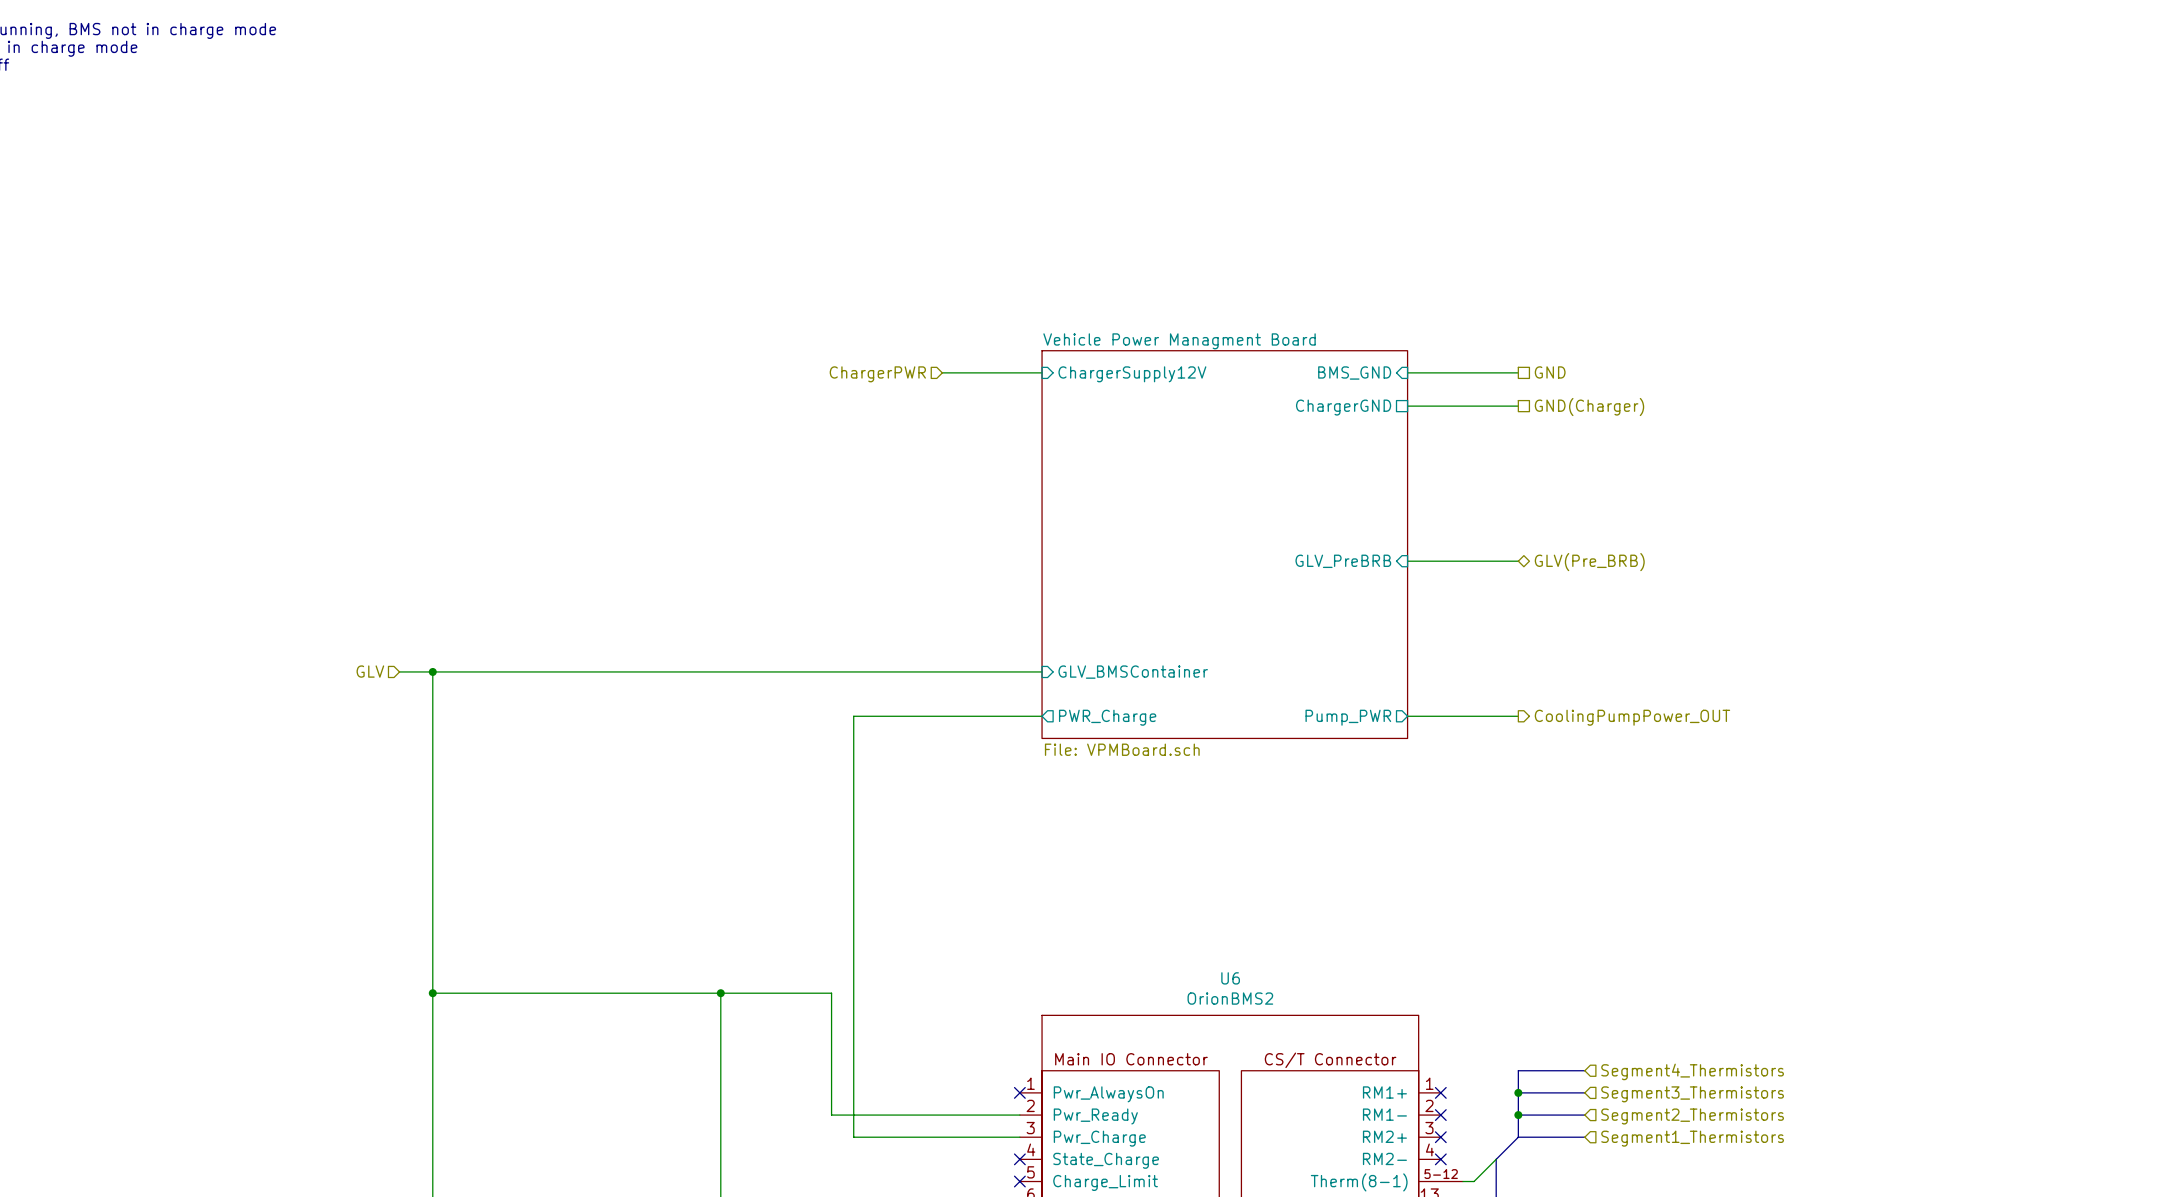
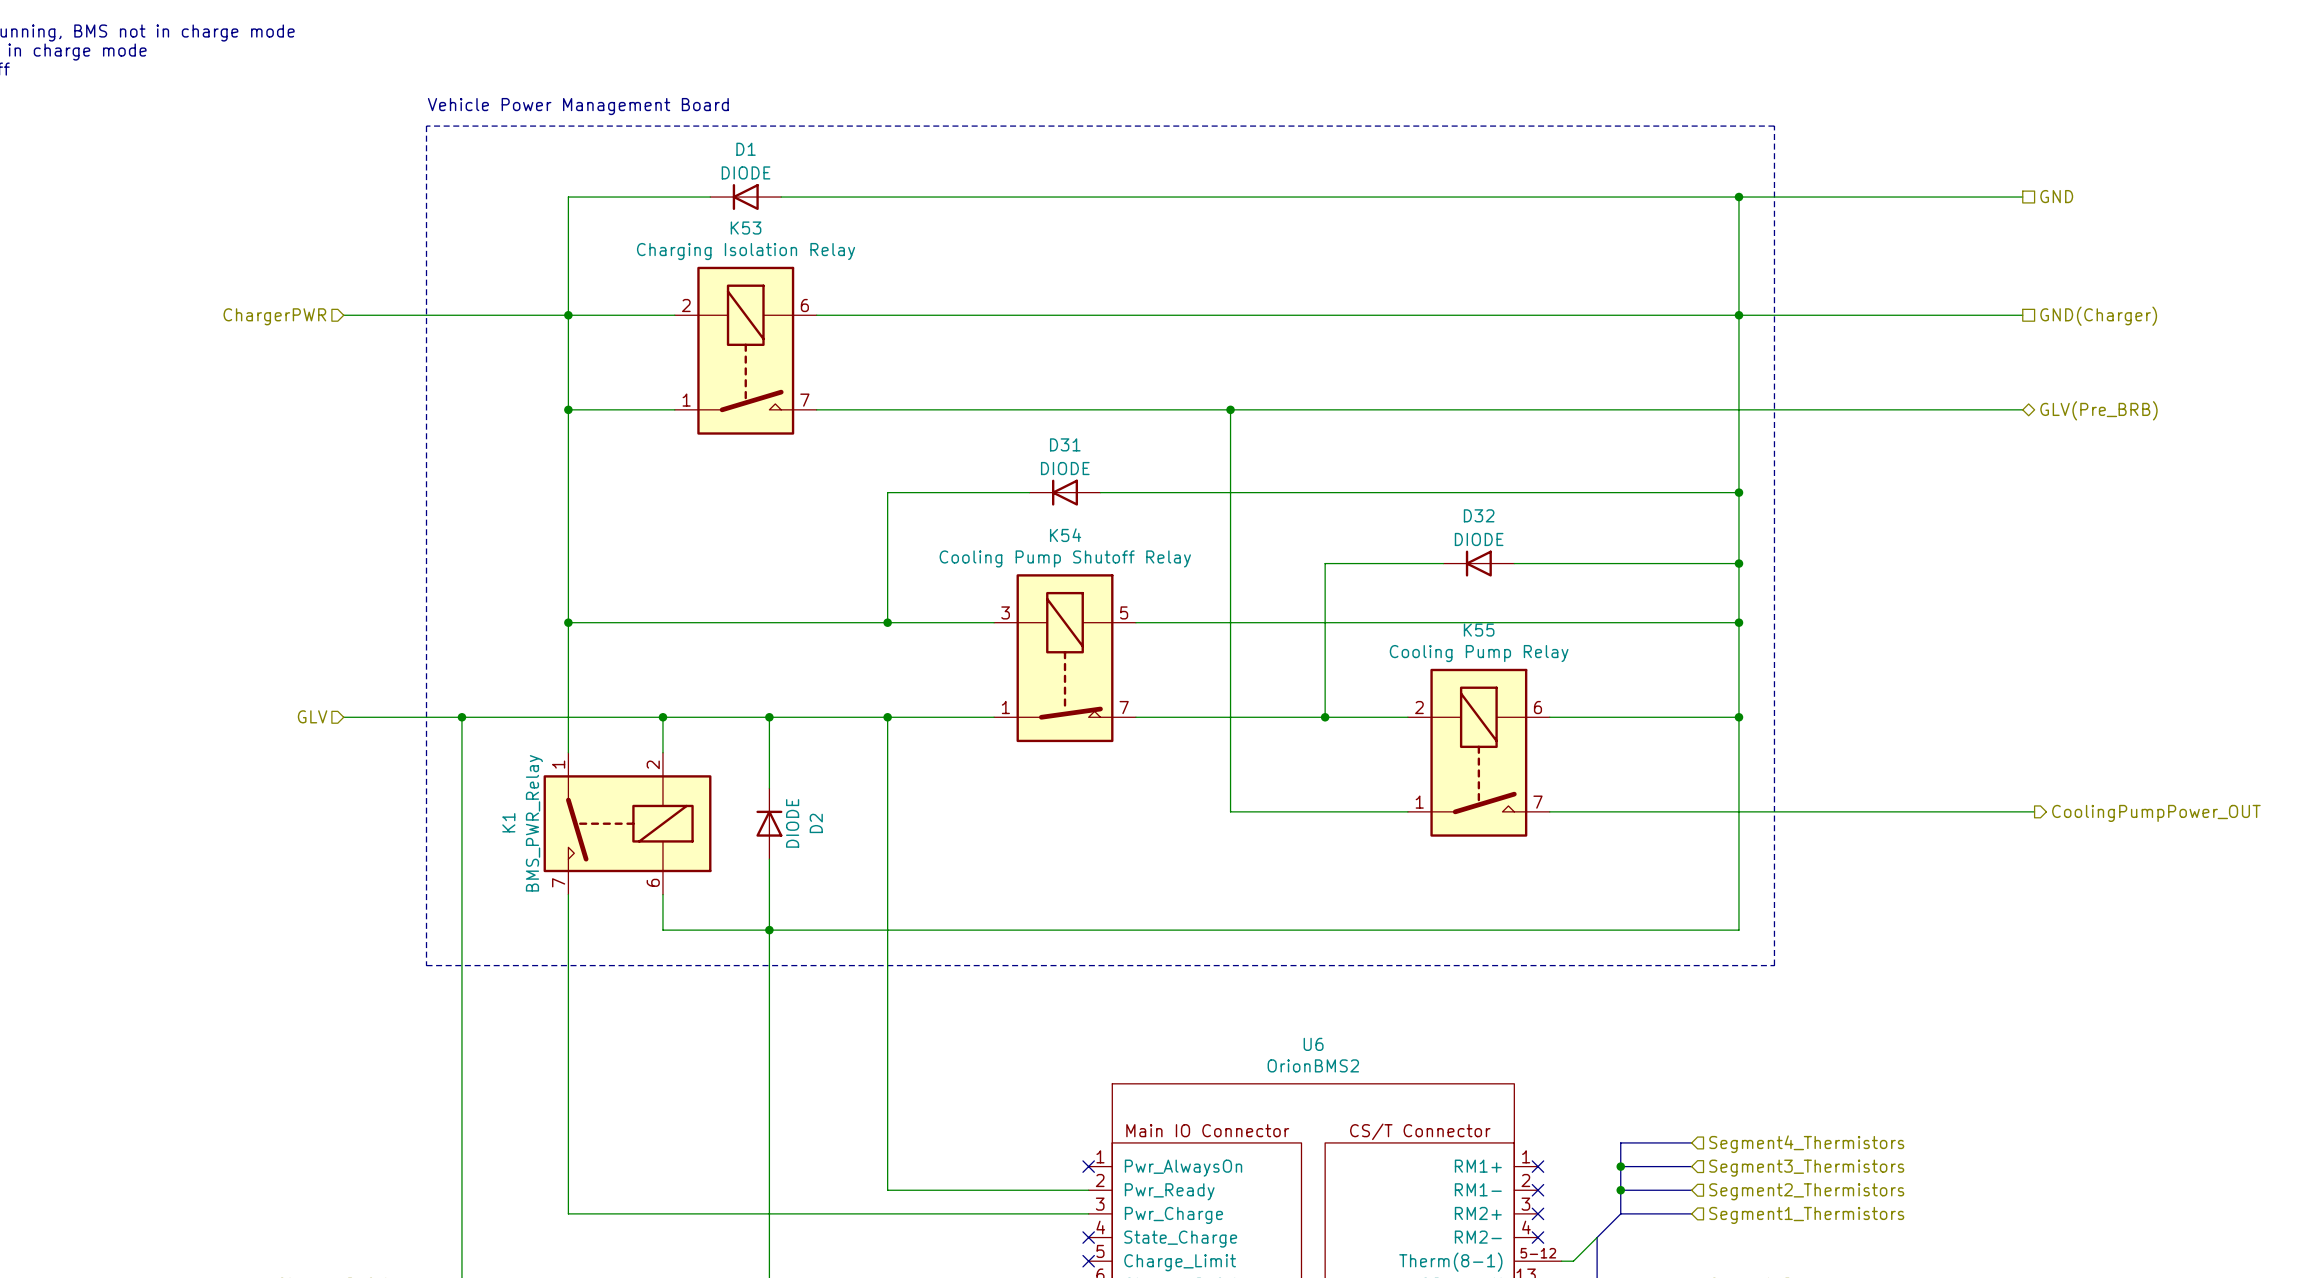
text: none -> Vehicle Power Management Board (578, 106)
line: none -> (426, 126) (1774, 126) (1774, 965) (426, 965) (426, 126)
wire: none -> (710, 197) (568, 197) (568, 752)
D1: none -> DIODE (745, 197)
wire: none -> (781, 197) (2022, 197)
wire: none -> (1738, 197) (1738, 930) (662, 930) (662, 894)
junction: none -> (1738, 197)
hierarchical label: none -> GND (2056, 196)
wire: none -> (343, 315) (674, 315)
junction: none -> (568, 315)
wire: none -> (816, 315) (2022, 315)
junction: none -> (1738, 315)
hierarchical label: none -> ChargerPWR (274, 316)
hierarchical label: none -> GND(Charger) (2098, 316)
K53: none -> Charging Isolation Relay (745, 350)
wire: (942, 372) (1042, 372) -> none
sheet pin: BMS_GND (1354, 372) -> none
wire: (1407, 372) (1518, 372) -> none
hierarchical label: GND (1550, 372) -> none
hierarchical label: ChargerPWR (877, 374) -> none
sheet pin: ChargerSupply12V (1132, 374) -> none
wire: none -> (568, 409) (674, 409)
junction: none -> (568, 409)
wire: none -> (816, 409) (2022, 409)
wire: none -> (1230, 409) (1230, 811) (1407, 811)
junction: none -> (1230, 409)
hierarchical label: none -> GLV(Pre_BRB) (2098, 410)
wire: (1407, 406) (1518, 406) -> none
sheet pin: ChargerGND (1343, 407) -> none
hierarchical label: GND(Charger) (1589, 407) -> none
wire: none -> (1029, 492) (887, 492) (887, 622)
D31: none -> DIODE (1065, 492)
wire: none -> (1100, 492) (1738, 492)
junction: none -> (1738, 492)
wire: none -> (1443, 563) (1325, 563) (1325, 717)
D32: none -> DIODE (1478, 563)
wire: none -> (1514, 563) (1738, 563)
junction: none -> (1738, 563)
sheet Vehicle Power Managment Board: File: VPMBoard.sch (1224, 544) -> none
sheet pin: GLV_PreBRB (1343, 561) -> none
wire: (1407, 561) (1518, 561) -> none
hierarchical label: GLV(Pre_BRB) (1589, 562) -> none
wire: none -> (568, 622) (994, 622)
junction: none -> (568, 622)
junction: none -> (887, 622)
wire: none -> (1135, 622) (1738, 622)
junction: none -> (1738, 622)
K54: none -> Cooling Pump Shutoff Relay (1065, 658)
wire: none -> (343, 717) (426, 717)
hierarchical label position: GLV (370, 671) -> GLV (312, 716)
wire: none -> (662, 717) (662, 752)
junction: none -> (662, 717)
wire: none -> (769, 717) (769, 788)
junction: none -> (769, 717)
junction: none -> (887, 717)
wire: none -> (1135, 717) (1407, 717)
junction: none -> (1325, 717)
wire: none -> (1549, 717) (1738, 717)
junction: none -> (1738, 717)
sheet pin: GLV_BMSContainer (1133, 672) -> none
K55: none -> Cooling Pump Relay (1478, 752)
wire: (1042, 716) (853, 716) (853, 1137) -> (568, 894) (568, 1213) (911, 1213)
wire: (1407, 716) (1518, 716) -> none
sheet pin: PWR_Charge (1107, 717) -> none
sheet pin: Pump_PWR (1348, 717) -> none
hierarchical label: CoolingPumpPower_OUT (1632, 717) -> none
wire: none -> (1549, 811) (2034, 811)
hierarchical label: none -> CoolingPumpPower_OUT (2156, 813)
K1: none -> BMS_PWR_Relay (627, 823)
D2: none -> DIODE (769, 823)
wire: none -> (769, 859) (769, 1060)
junction: none -> (769, 930)
wire: (432, 993) (831, 993) -> (887, 717) (887, 1060)
junction: (432, 993) -> none
junction: (720, 993) -> none

